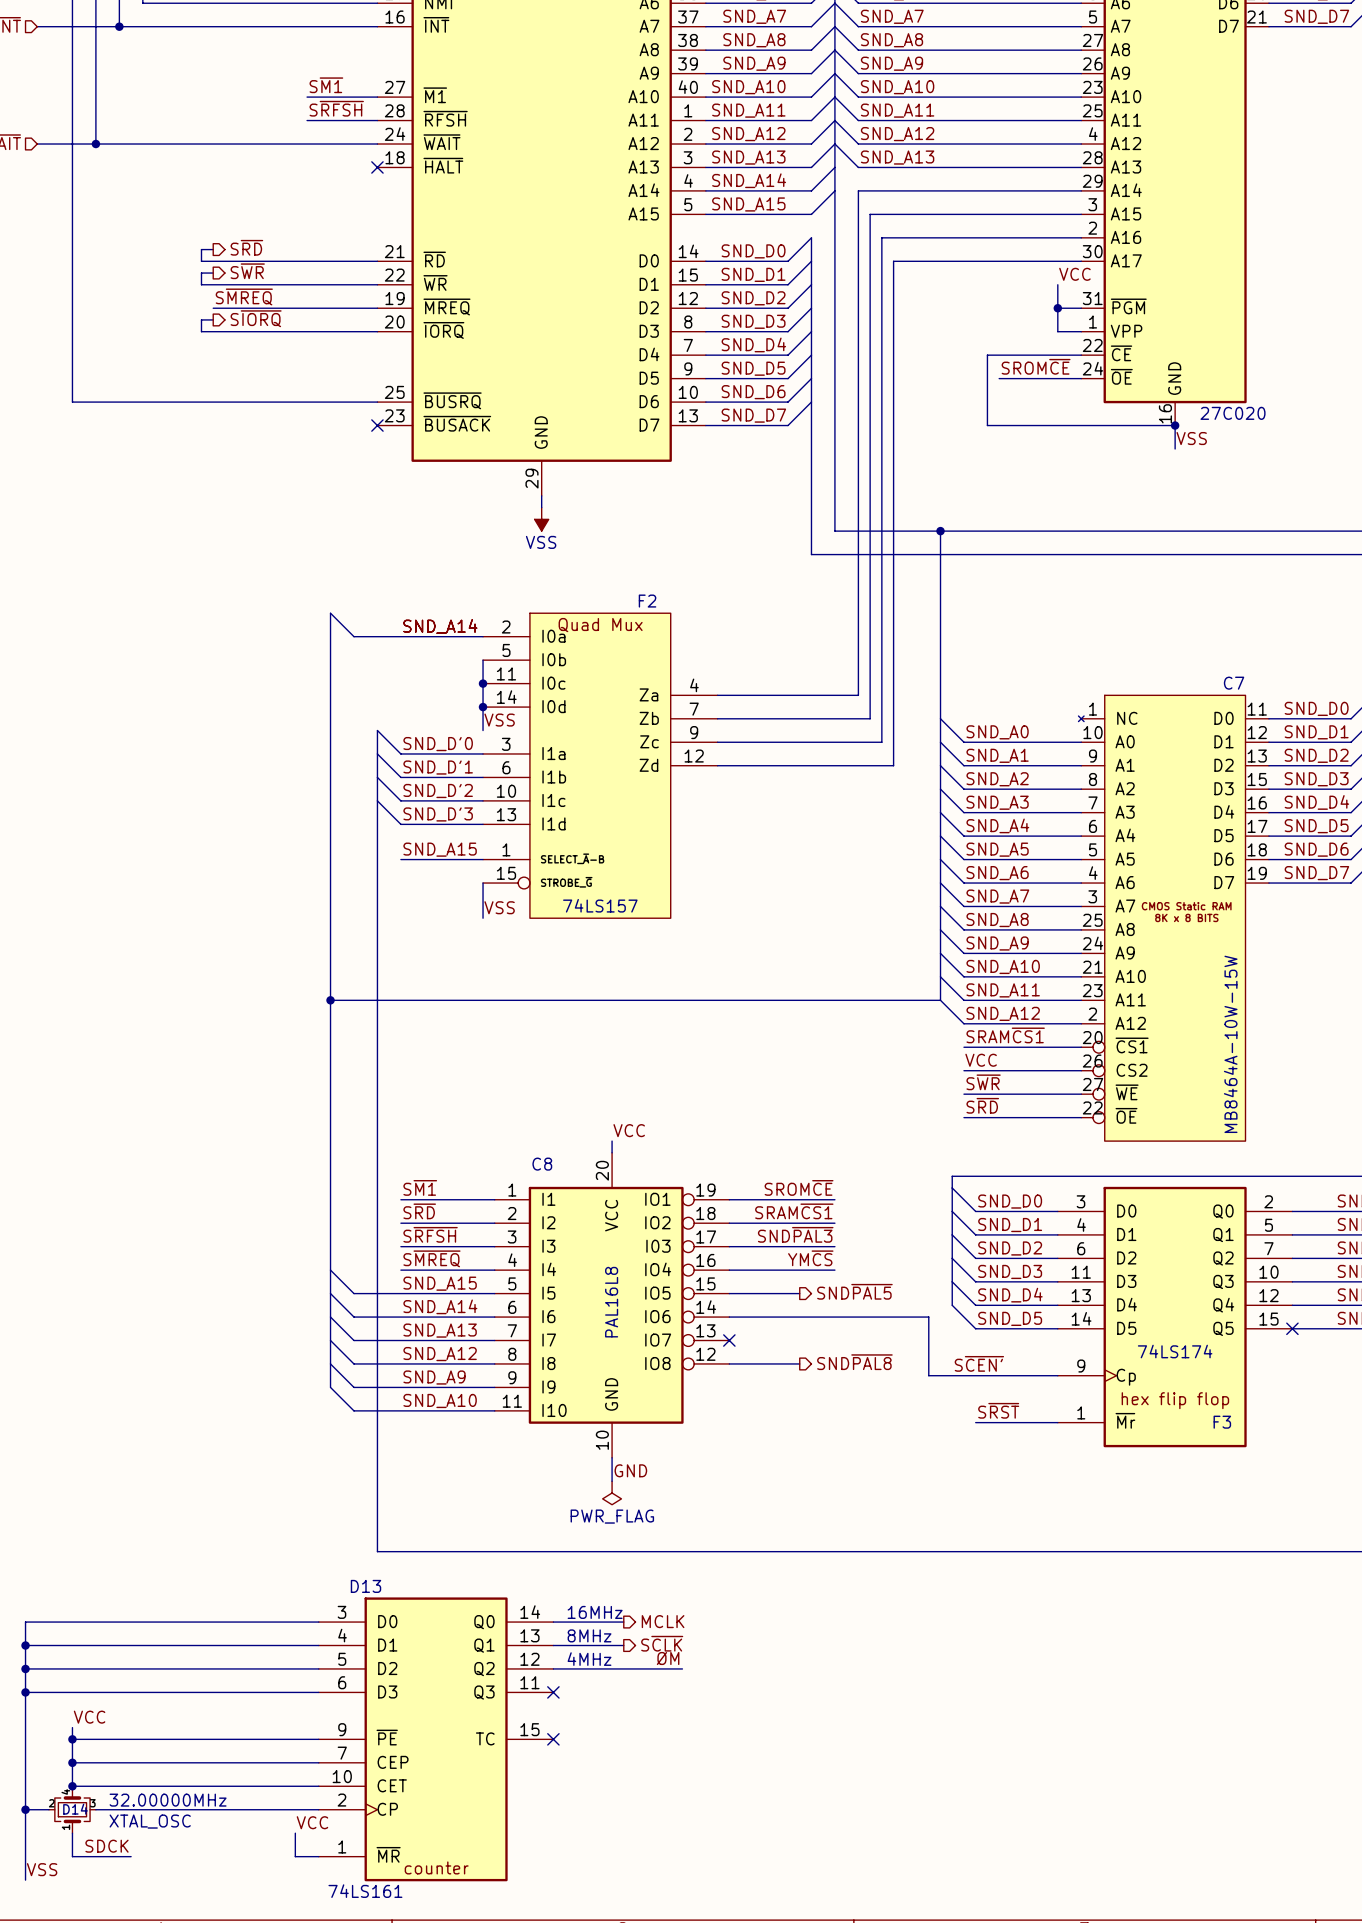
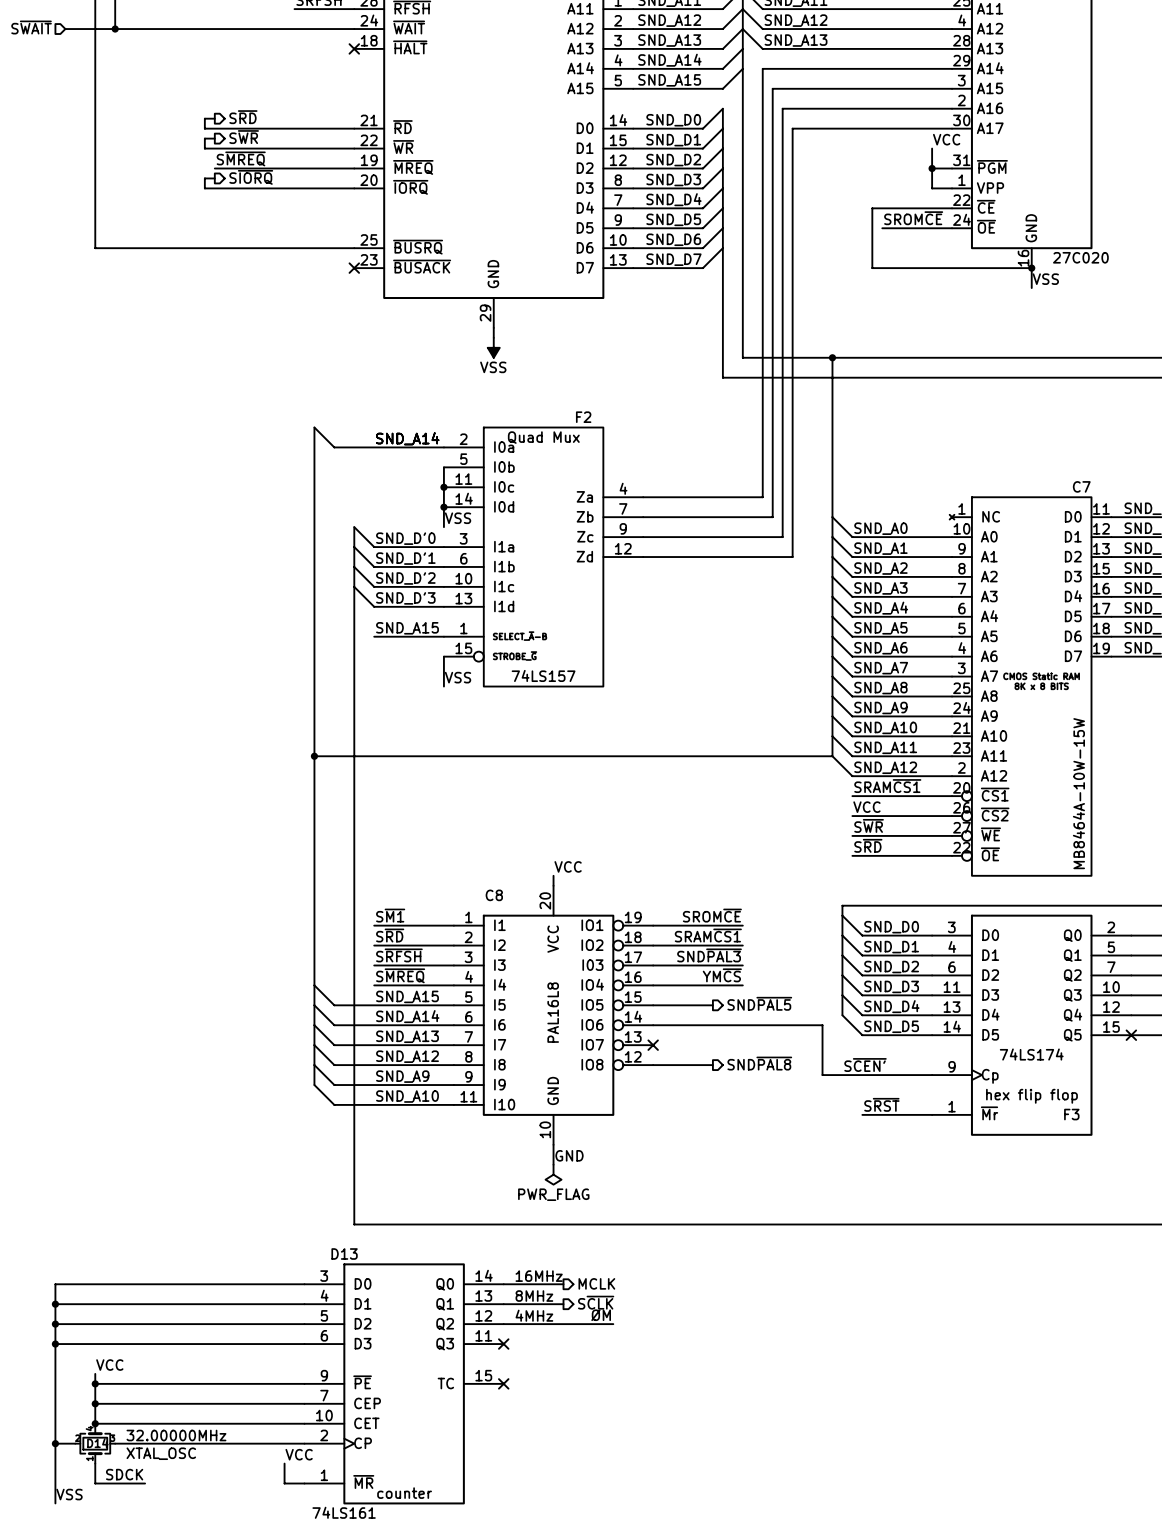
C7 pin name: CS2 (1132, 1070) -> ~{CS2} (995, 814)

